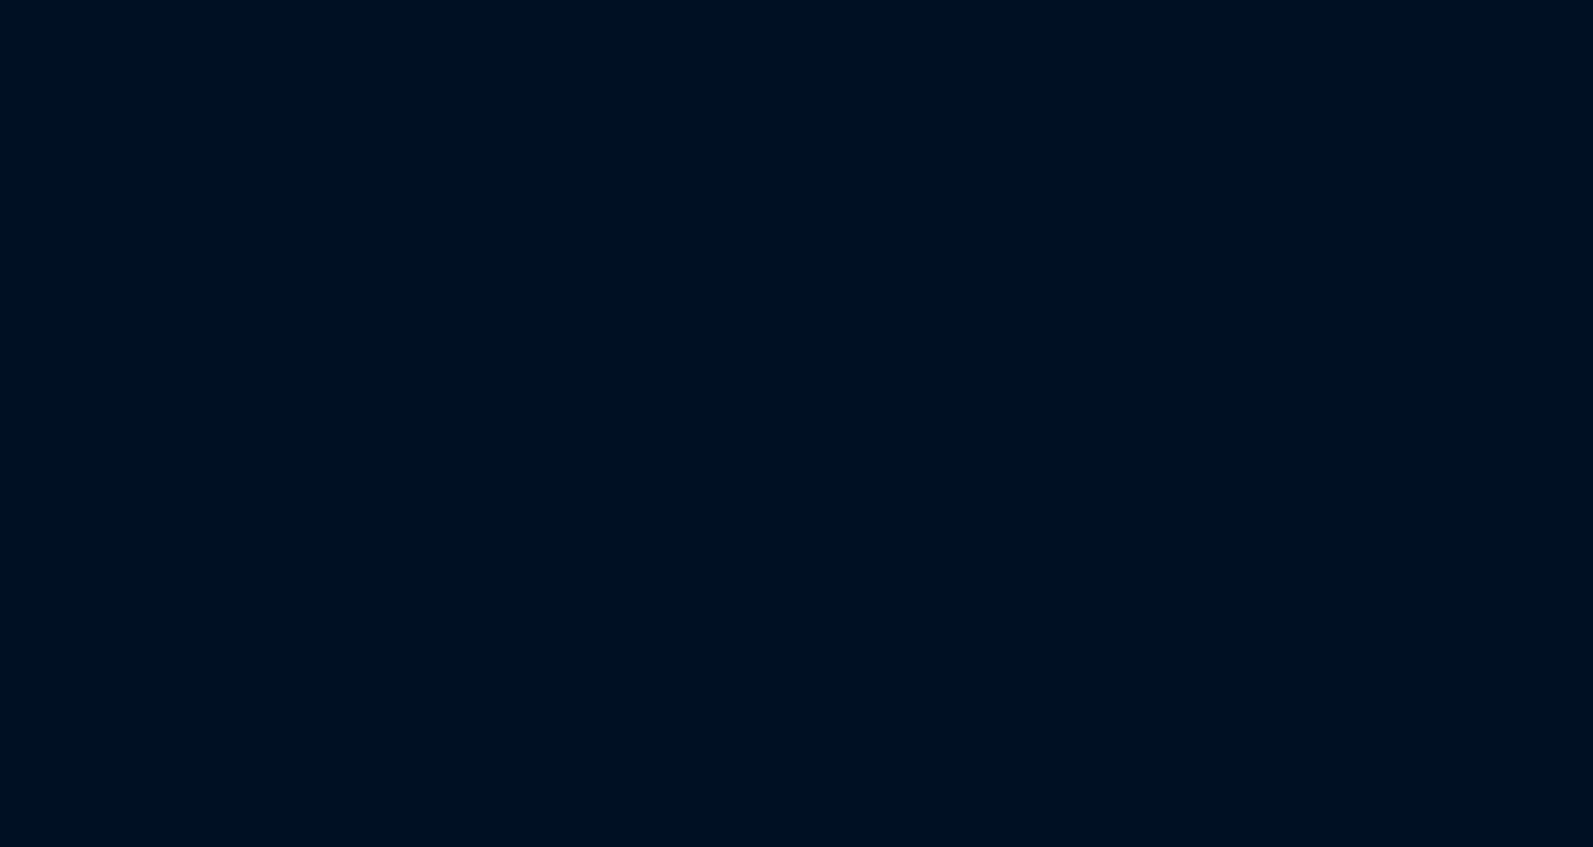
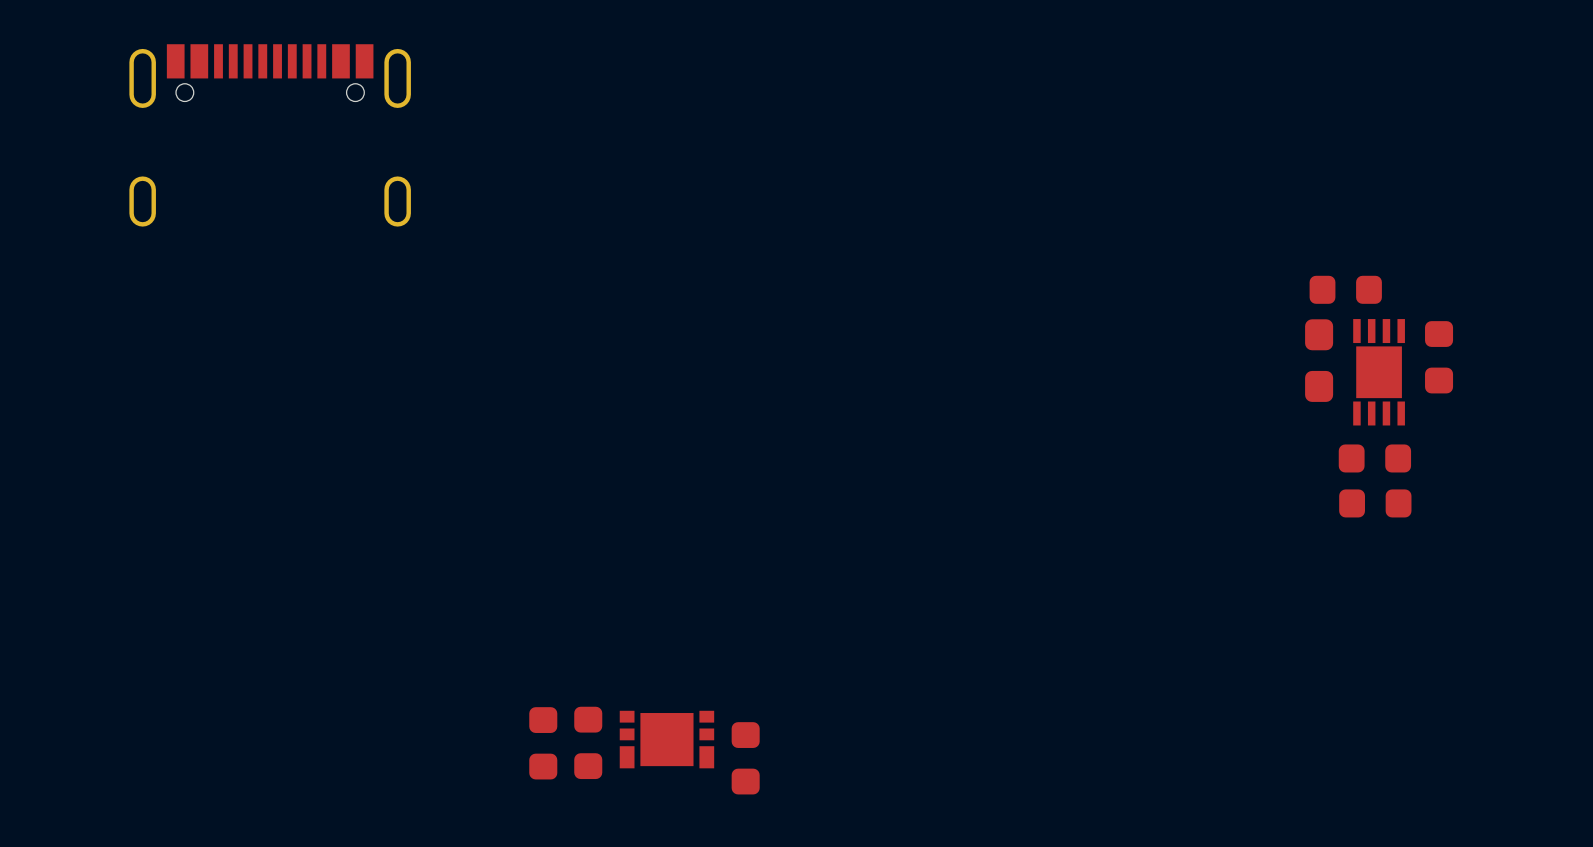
part: none -> (270, 135)
part: none -> (1345, 289)
part: none -> (1439, 357)
part: none -> (1319, 360)
part: none -> (1379, 372)
part: none -> (1374, 458)
part: none -> (1375, 503)
part: none -> (666, 739)
part: none -> (588, 742)
part: none -> (543, 743)
part: none -> (745, 758)

